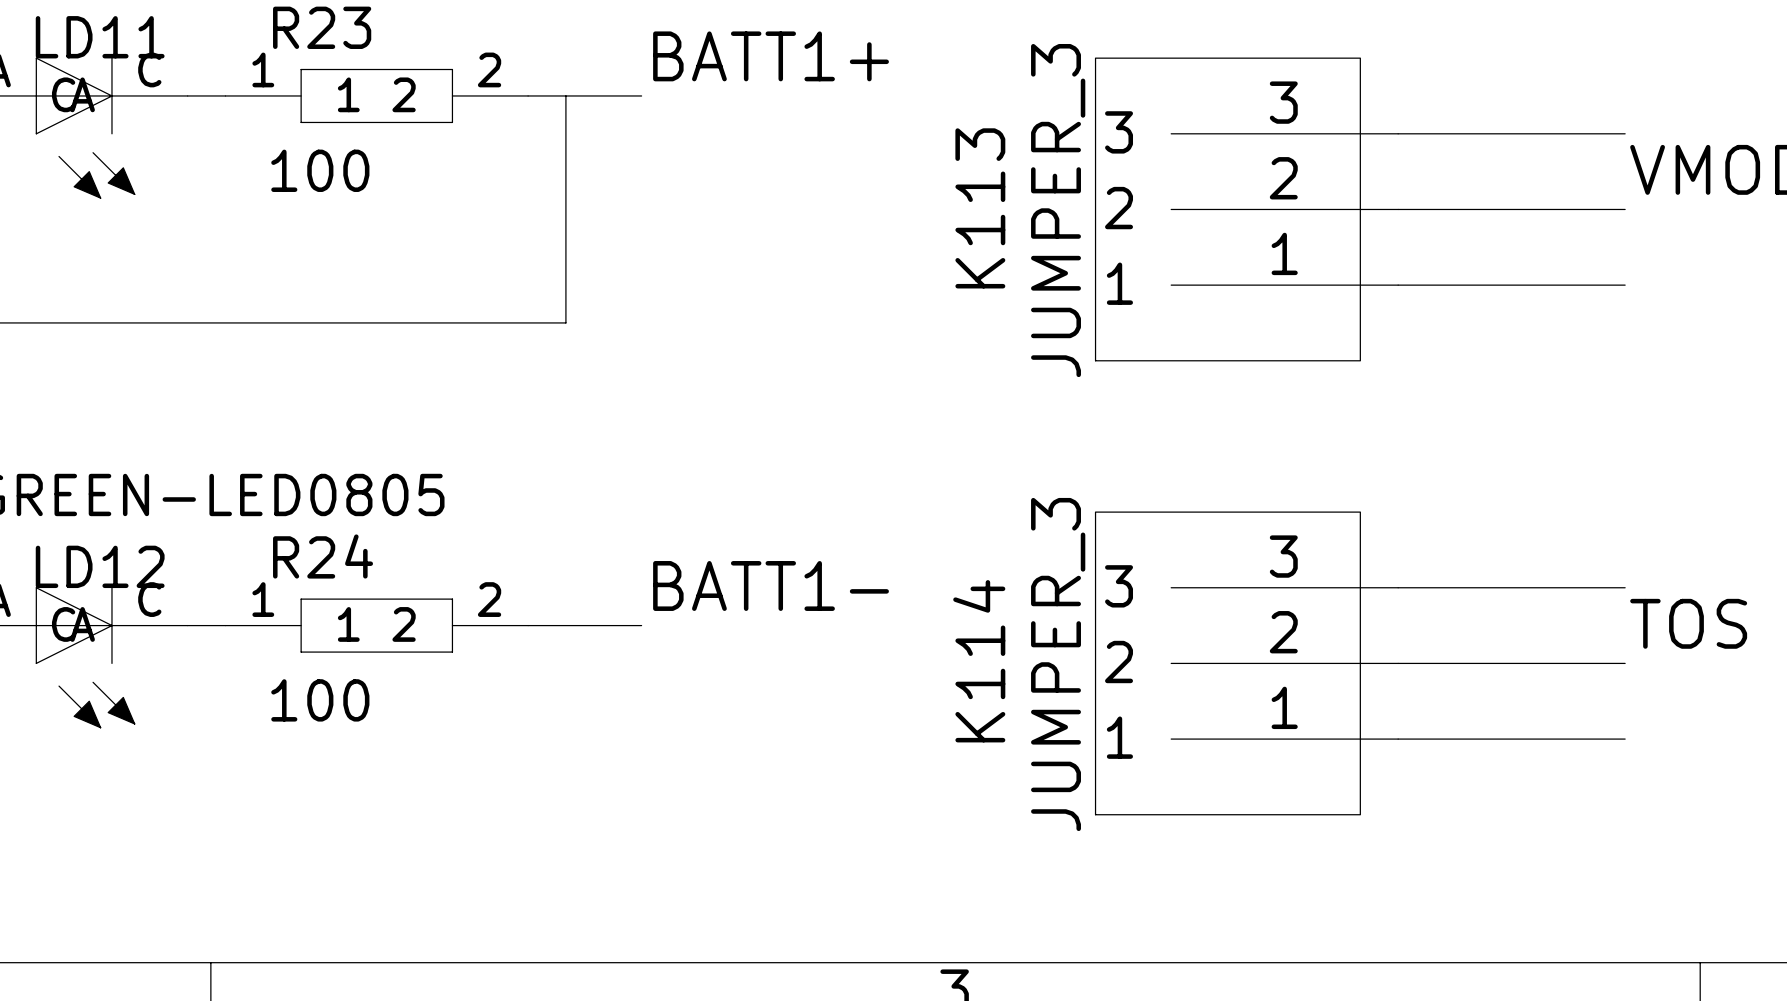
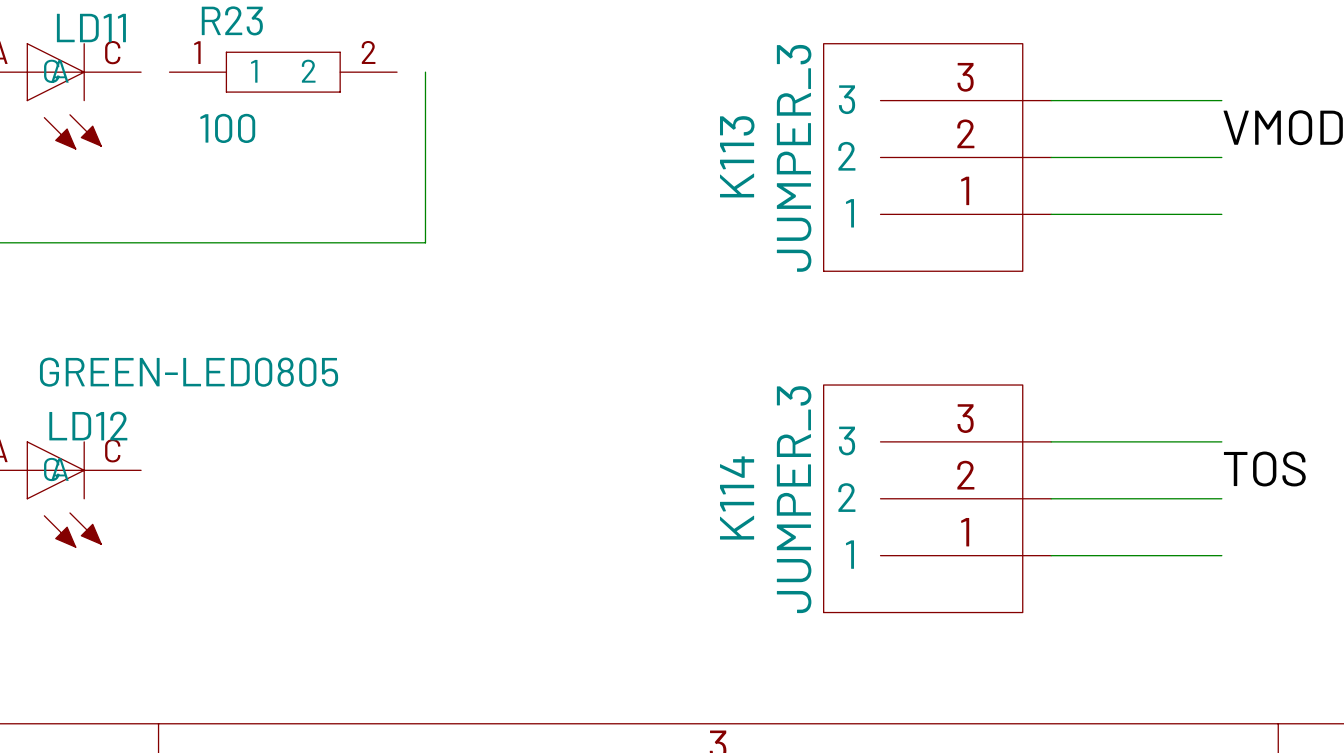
label: BATT1+ (771, 56) -> none
wire: (187, 95) (225, 95) -> none
wire: (528, 95) (641, 95) -> none
label: BATT1- (771, 585) -> none
wire: (187, 625) (225, 625) -> none
R24: 100 (376, 625) -> none
wire: (528, 625) (641, 625) -> none

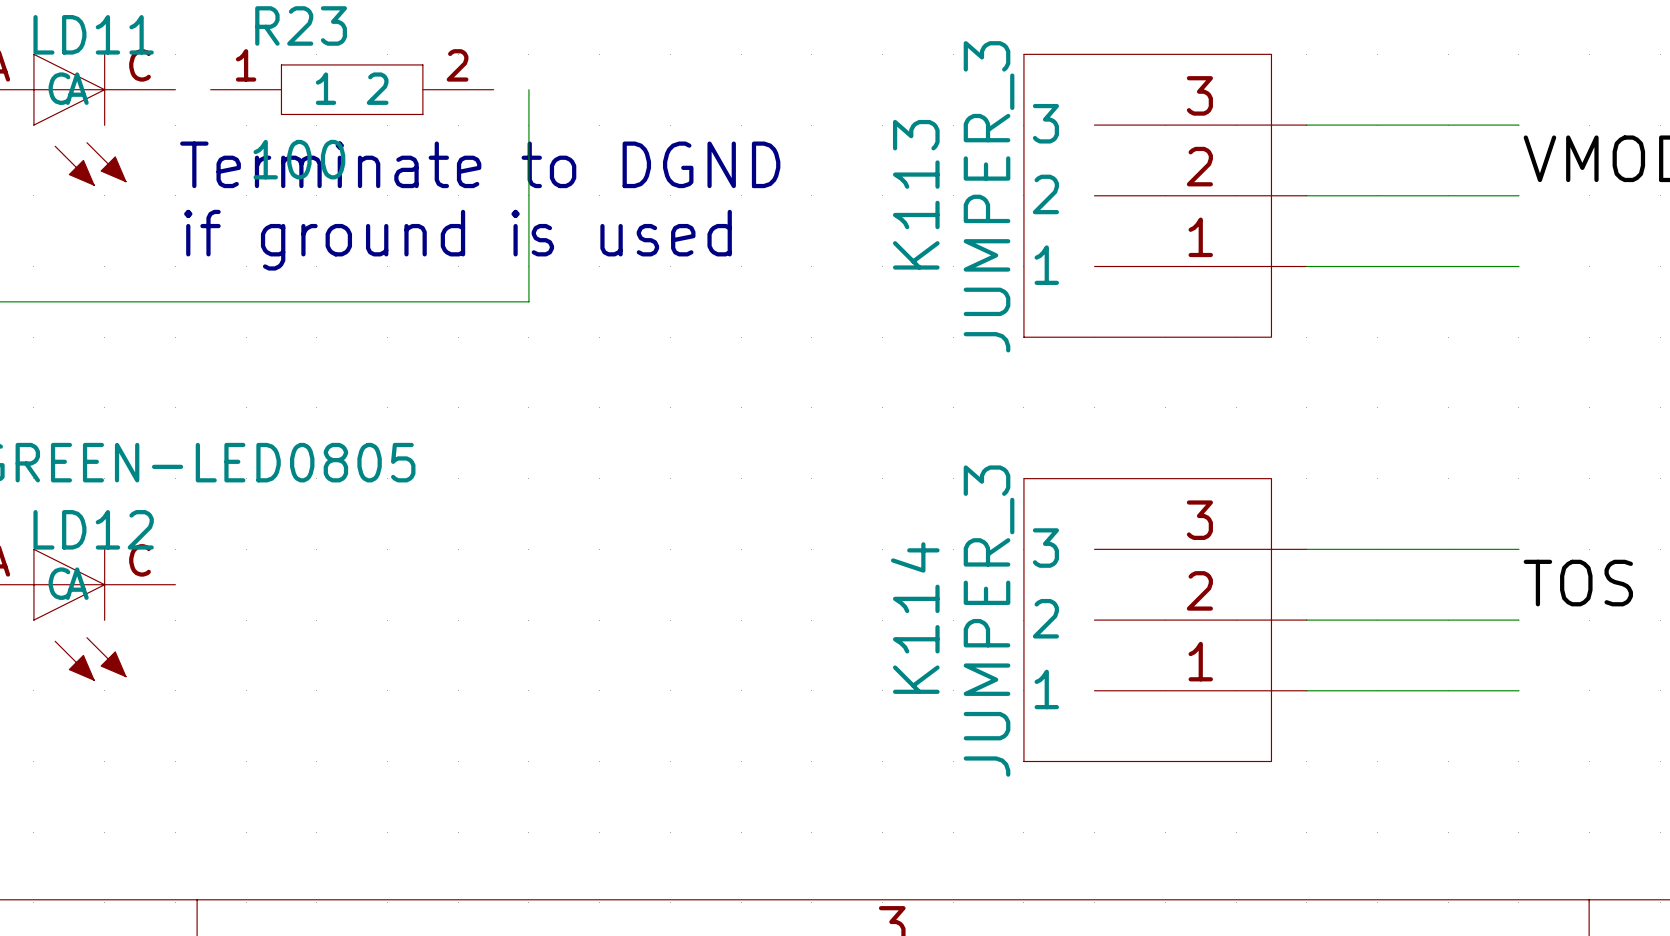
text: none -> Terminate to DGND (480, 164)
text: none -> if ground is used (458, 240)

